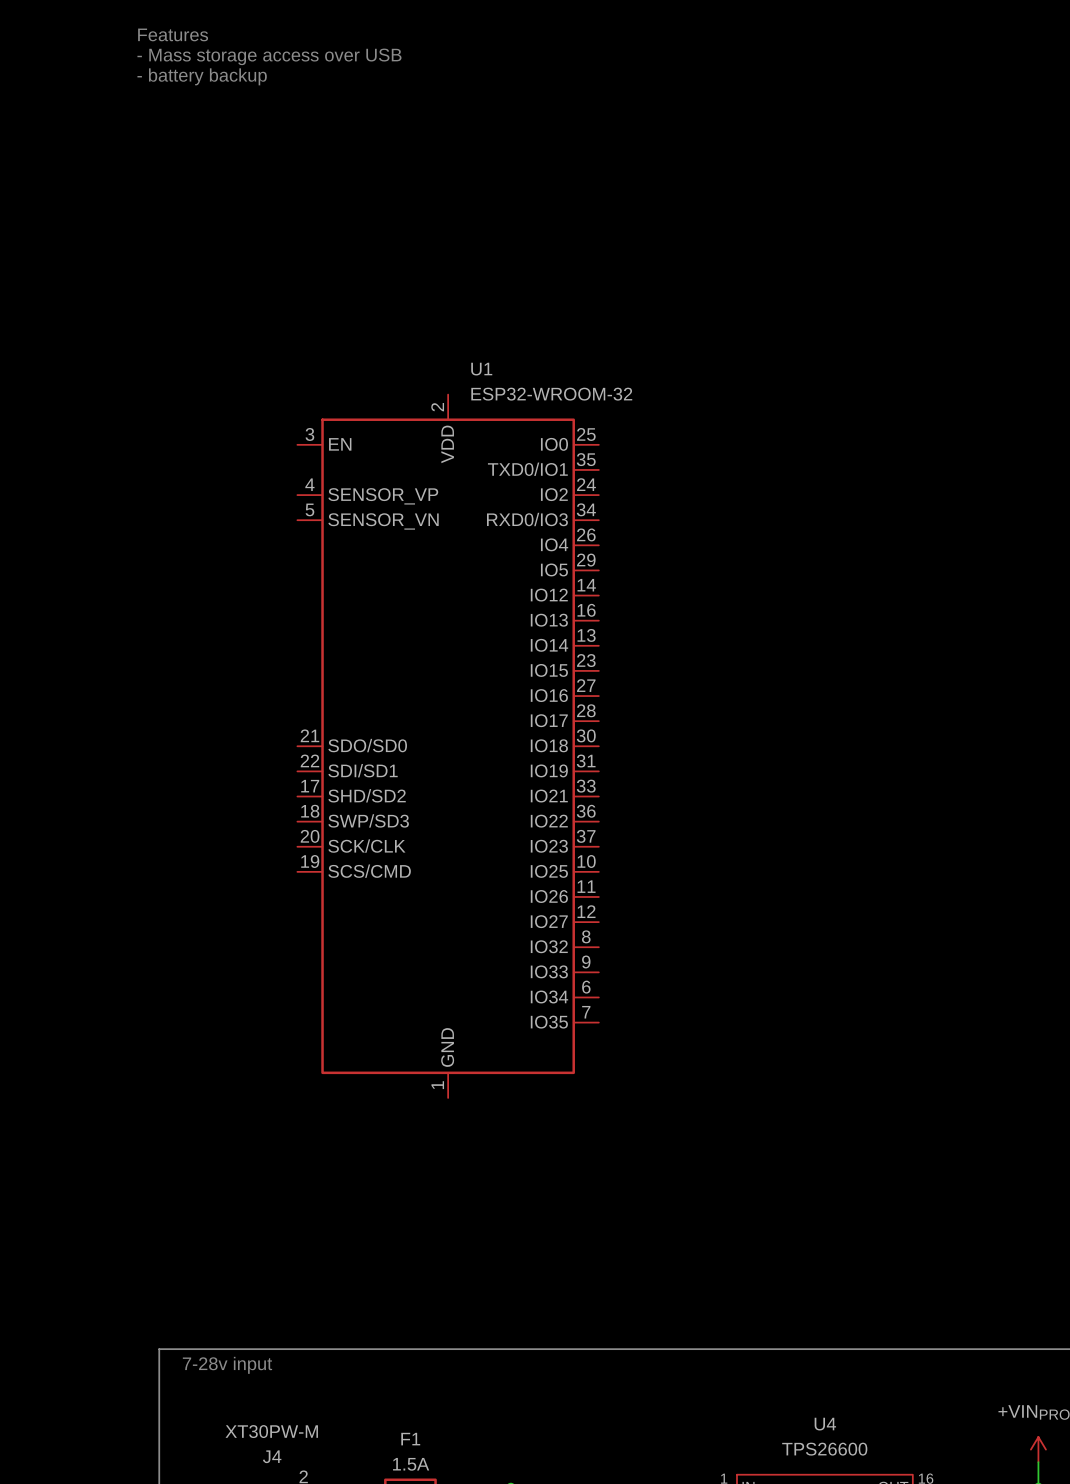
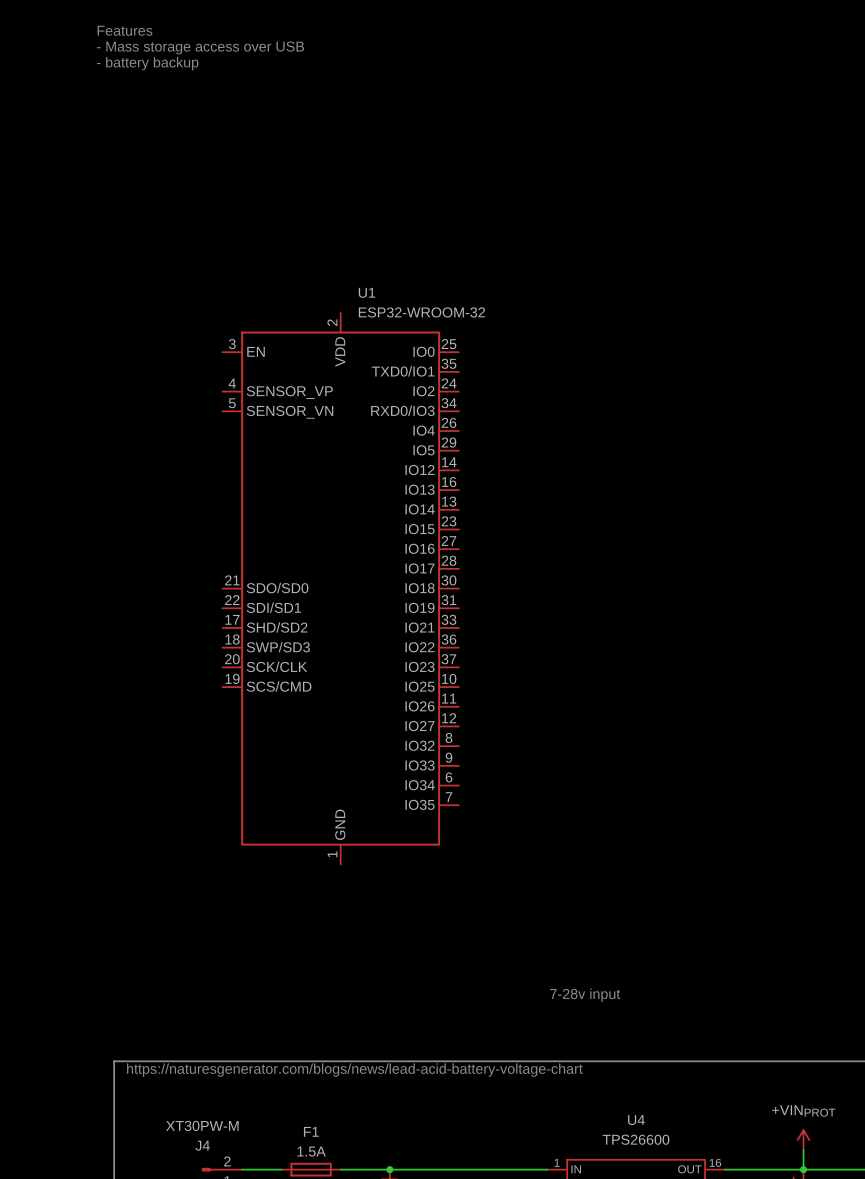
text: none -> 7-28v input (585, 995)
text: none -> https://naturesgenerator.com/blogs/news/lead-acid-battery-voltage-chart (354, 1070)
text: 7-28v input (227, 1365) -> none

